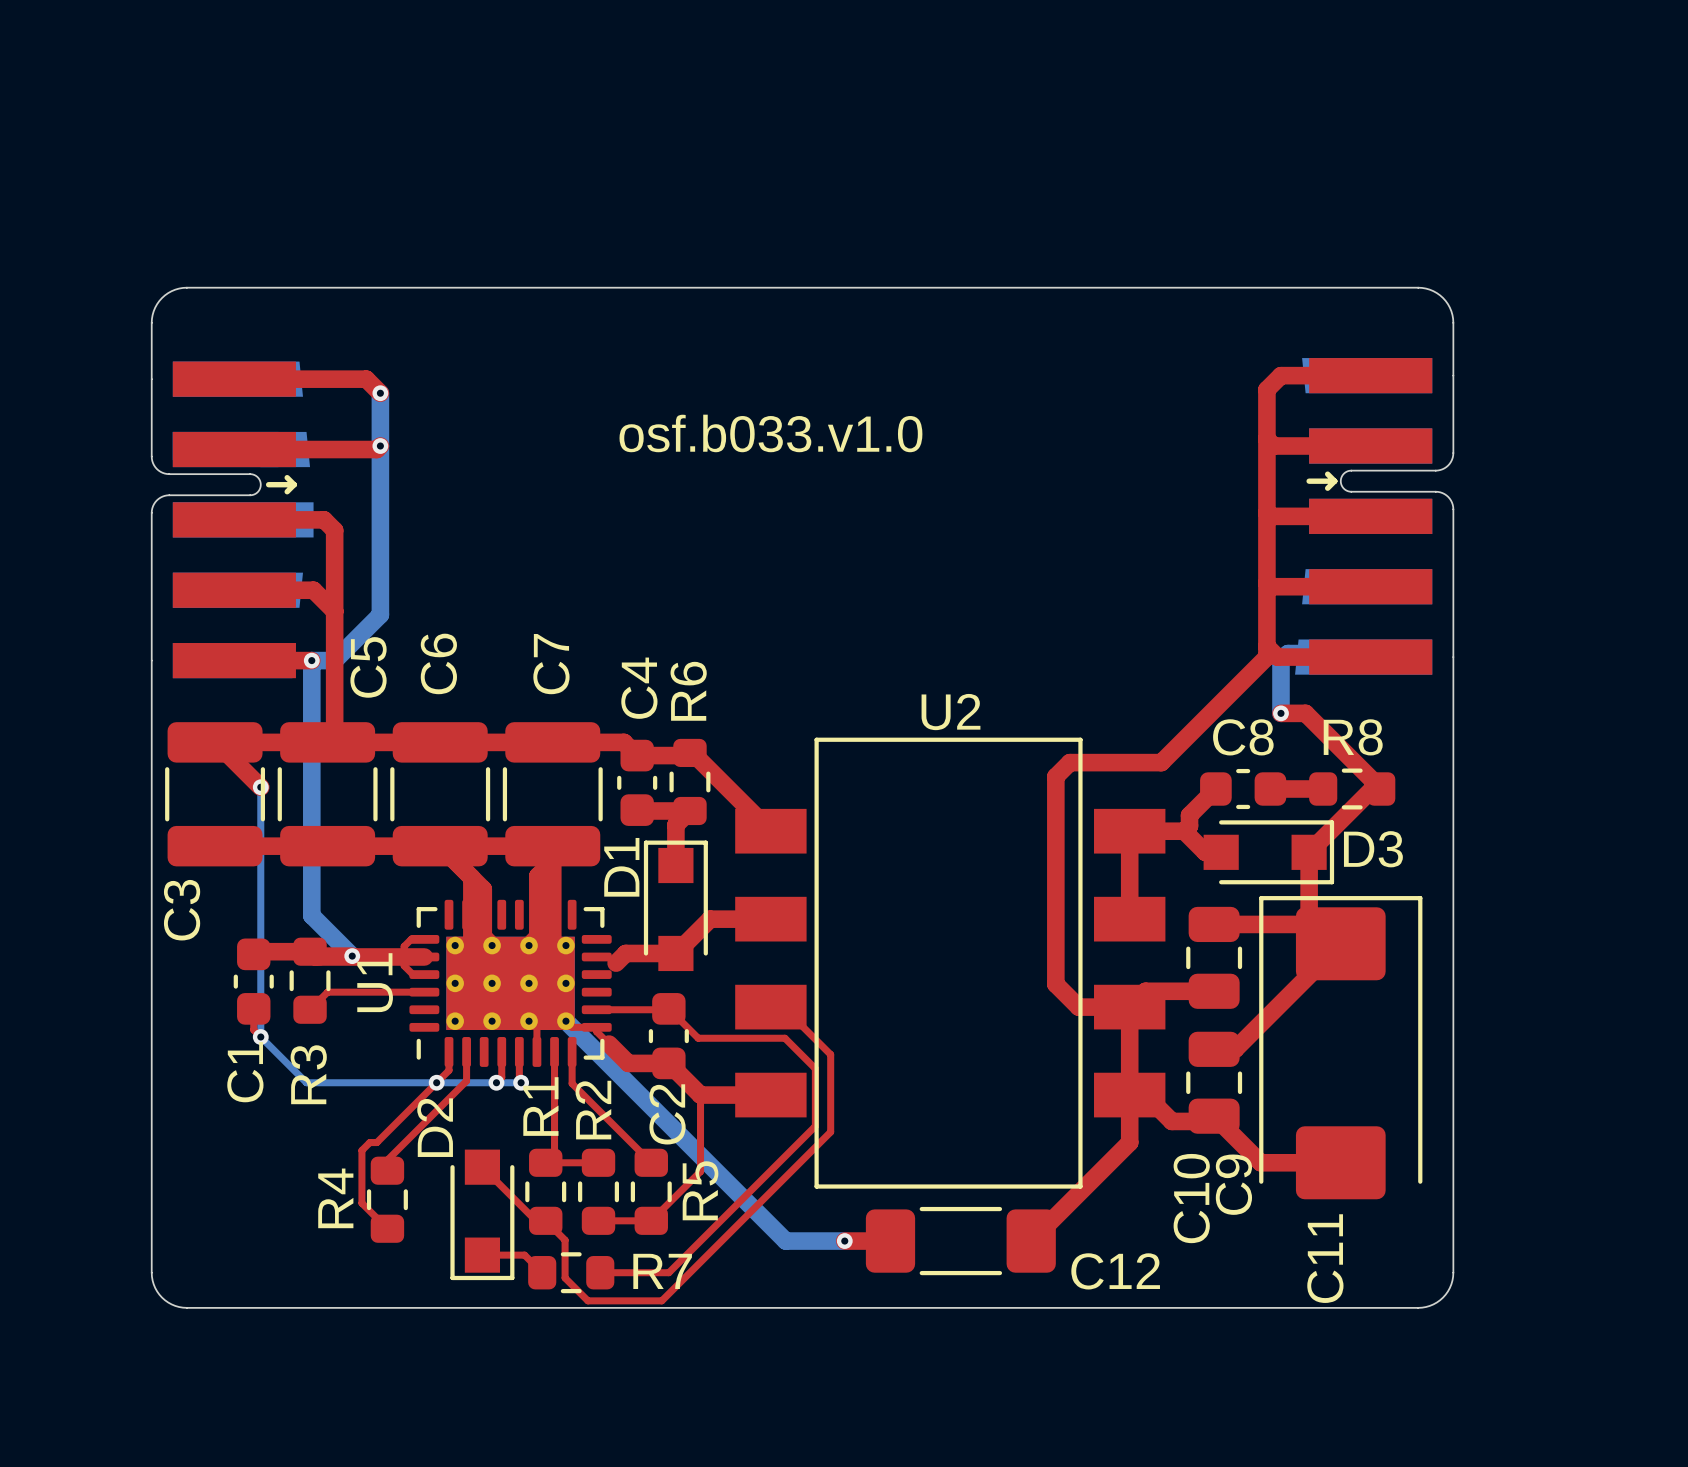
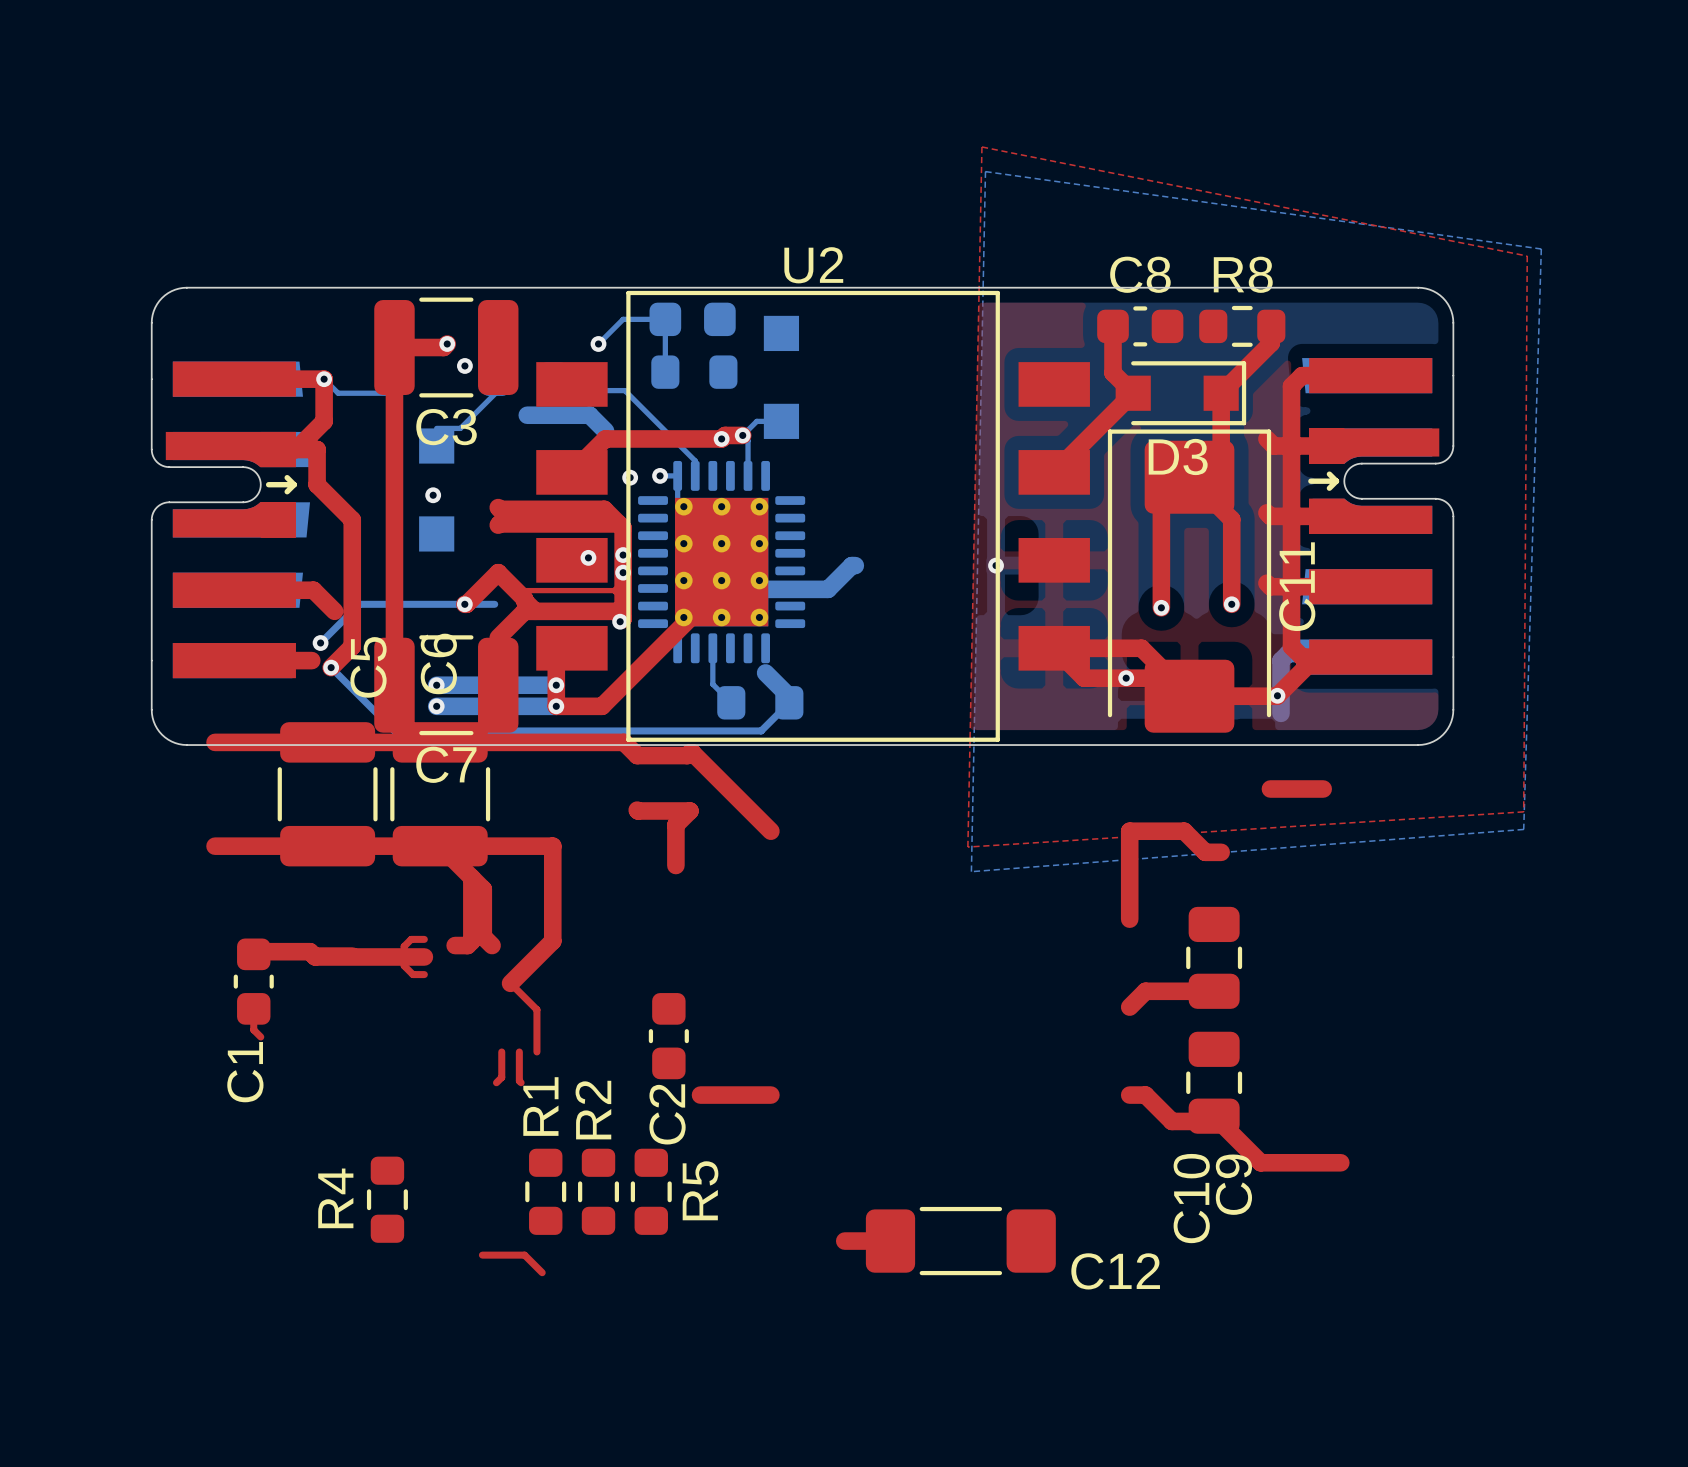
top zone outline: none -> (981, 146) (967, 847) (1523, 811) (1527, 256) (981, 146)
bottom zone outline: none -> (985, 171) (971, 871) (1523, 829) (1541, 249) (985, 171)
top track: none -> (1113, 326) (1113, 373) (1133, 393) (1054, 472)
top track: none -> (1271, 326) (1271, 343) (1221, 393) (1221, 445) (1161, 505) (1161, 607)
top track: none -> (447, 343) (443, 347) (394, 347) (394, 685)
via: none -> (447, 343)
bottom track: none -> (598, 343) (623, 319) (665, 319) (665, 372)
via: none -> (598, 343)
part footprint: [1295, 358, 1455, 675] -> [1295, 358, 1455, 675]
part footprint: [150, 361, 314, 679] -> [150, 361, 311, 679]
via: none -> (464, 365)
top track: (1302, 375) (1280, 375) (1266, 389) (1266, 657) (1161, 762) (1069, 762) (1055, 776) (1055, 984) (1078, 1007) (1129, 1007) (1129, 1142) (1031, 1241) -> none
top track: (324, 379) (366, 379) (380, 393) -> (324, 379) (324, 421) (295, 449)
bottom track: none -> (324, 379) (338, 393) (392, 393)
via: none -> (324, 379)
bottom track: (380, 393) (380, 614) (334, 660) (311, 660) (311, 915) (352, 956) -> none
via: (380, 393) -> none
bottom track: none -> (495, 393) (460, 428) (436, 428)
bottom track: none -> (553, 393) (599, 393) (602, 390) (624, 390) (695, 460) (695, 475)
bottom track: none -> (527, 415) (589, 415) (605, 431)
bottom track: none -> (781, 421) (756, 421) (742, 435) (748, 440) (748, 475)
text: osf.b033.v1.0 (770, 433) -> none
top track: none -> (742, 435) (725, 435) (721, 438) (605, 438) (571, 472)
via: none -> (742, 435)
via: none -> (721, 438)
top track: (380, 446) (376, 449) (317, 449) -> (330, 666) (331, 667) (352, 646) (352, 519) (317, 484) (317, 449)
via: (380, 446) -> none
bottom track: none -> (660, 475) (677, 475) (677, 518) (748, 589) (828, 589) (851, 565) (855, 565)
via: none -> (660, 475)
via: none -> (630, 477)
top track: none -> (1189, 477) (1231, 519) (1231, 604)
via: none -> (433, 495)
top track: none -> (498, 507) (500, 509) (604, 509) (623, 528) (623, 618)
top track: (234, 519) (324, 519) (334, 530) (334, 735) (327, 742) -> none
top track: none -> (618, 523) (498, 525)
via: none -> (623, 555)
via: none -> (588, 557)
top track: none -> (721, 562) (721, 586) (602, 706) (556, 706) (556, 663) (556, 685)
via: none -> (996, 565)
top track: none -> (498, 572) (464, 604)
top track: none -> (498, 572) (535, 611)
top track: none -> (498, 572) (516, 590) (613, 590)
via: none -> (623, 572)
via: none -> (464, 604)
bottom track: none -> (494, 604) (359, 604) (320, 643)
via: none -> (1231, 604)
via: none -> (1161, 607)
top track: none -> (623, 618) (615, 611) (524, 611) (498, 637)
via: none -> (620, 621)
via: none -> (320, 643)
top track: (1266, 646) (1277, 657) (1302, 657) -> (1302, 375) (1291, 386) (1291, 646) (1302, 657)
bottom track: none -> (712, 648) (712, 684) (731, 702)
top track: none -> (1316, 657) (1277, 696) (1189, 696) (1141, 648) (1054, 648) (1084, 678) (1171, 678)
via: (311, 660) -> none
C7 name position: C7 (551, 664) -> C7 (446, 764)
bottom track: none -> (331, 667) (394, 730) (761, 730) (789, 702) (789, 696) (765, 672)
via: none -> (331, 667)
via: none -> (1126, 678)
bottom track: none -> (436, 685) (556, 685)
via: none -> (436, 685)
via: none -> (556, 685)
bottom track: none -> (436, 706) (556, 706)
via: none -> (436, 706)
via: none -> (556, 706)
board edge: (151, 709) (151, 1276) (155, 1287) (164, 1300) (175, 1305) (186, 1307) (1418, 1307) (1433, 1304) (1447, 1291) (1453, 1272) (1453, 709) -> (151, 709) (153, 721) (162, 734) (175, 743) (186, 745) (1418, 745) (1433, 741) (1443, 734) (1449, 725) (1453, 709)
top track: (1280, 713) (1305, 713) (1381, 789) (1372, 789) (1309, 852) (1309, 912) (1340, 943) (1235, 1049) (1214, 1049) -> none
via position: (1280, 713) -> (1277, 695)
U2 footprint: [735, 737, 1166, 1189] -> [536, 290, 1090, 742]
top track: (215, 742) (260, 787) -> none
R6 side: top (689, 781) -> bottom (694, 372)
C4 side: top (637, 782) -> bottom (692, 319)
bottom track: (260, 787) (260, 1037) (306, 1082) (521, 1082) -> none
via: (260, 787) -> none
top track: (1215, 789) (1189, 815) (1189, 825) (1184, 831) -> none
C8 position: (1243, 789) -> (1140, 326)
R8 position: (1352, 789) -> (1242, 326)
C3 rotation: 0° (215, 794) -> 90° clockwise (446, 347)
C3 position: (215, 794) -> (446, 347)
C7 rotation: 0° (552, 794) -> 90° clockwise (446, 685)
C7 position: (552, 794) -> (446, 685)
D3 name position: D3 (1373, 849) -> D3 (1178, 456)
D3 position: (1268, 852) -> (1180, 393)
top track: (552, 861) (537, 876) (537, 936) (529, 945) -> none
D1 side: top (675, 905) -> bottom (781, 377)
top track: (770, 919) (710, 919) (675, 953) (625, 953) (616, 963) -> none
top track: (1214, 924) (1321, 924) -> none
via: (352, 956) -> none
R3 side: top (310, 980) -> bottom (760, 702)
U1 side: top (510, 983) -> bottom (721, 562)
top track: (424, 992) (327, 992) (310, 1009) -> none
top track: (770, 1007) (783, 1007) (830, 1054) (830, 1132) (661, 1300) (587, 1300) (565, 1277) (565, 1240) (545, 1220) (536, 1220) (482, 1167) -> none
top track: (596, 1009) (668, 1008) (698, 1038) (784, 1038) (815, 1068) (815, 1126) (668, 1272) (600, 1272) -> none
top track: (565, 1021) (572, 1027) (596, 1027) (596, 1031) (628, 1063) (668, 1063) (700, 1095) (700, 1171) (651, 1220) (598, 1220) -> none
bottom track: (565, 1021) (785, 1241) (844, 1241) -> none
via: (260, 1037) -> none
C11 position: (1340, 1047) -> (1189, 581)
top track: (448, 1051) (448, 1070) (376, 1142) (369, 1142) (361, 1150) (361, 1203) (387, 1228) -> none
top track: (466, 1051) (466, 1080) (387, 1160) (387, 1170) -> none
top track: (554, 1051) (554, 1153) (545, 1162) (598, 1162) -> none
top track: (572, 1051) (572, 1083) (651, 1162) -> none
via: (436, 1082) -> none
via: (496, 1082) -> none
via: (521, 1082) -> none
D2 side: top (482, 1214) -> bottom (436, 489)
via: (844, 1241) -> none
C11 name position: C11 (1325, 1258) -> C11 (1297, 586)
R7: (571, 1272) -> none

